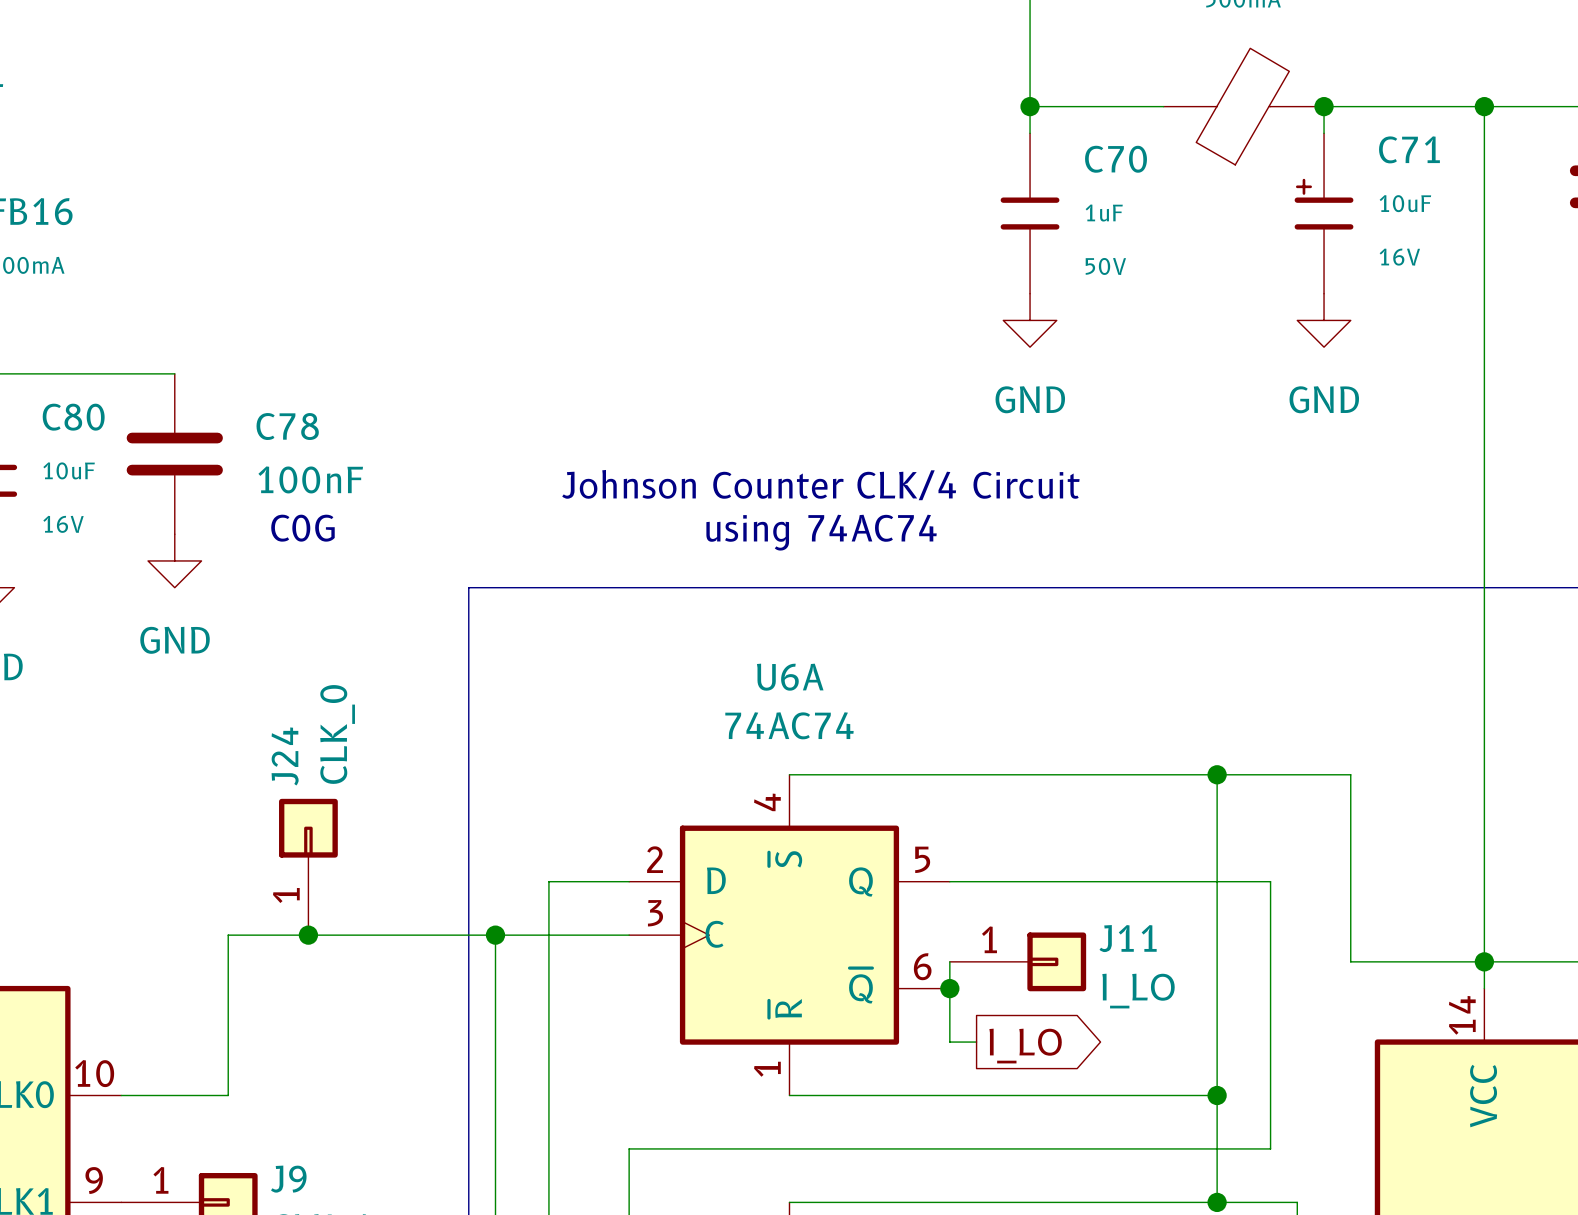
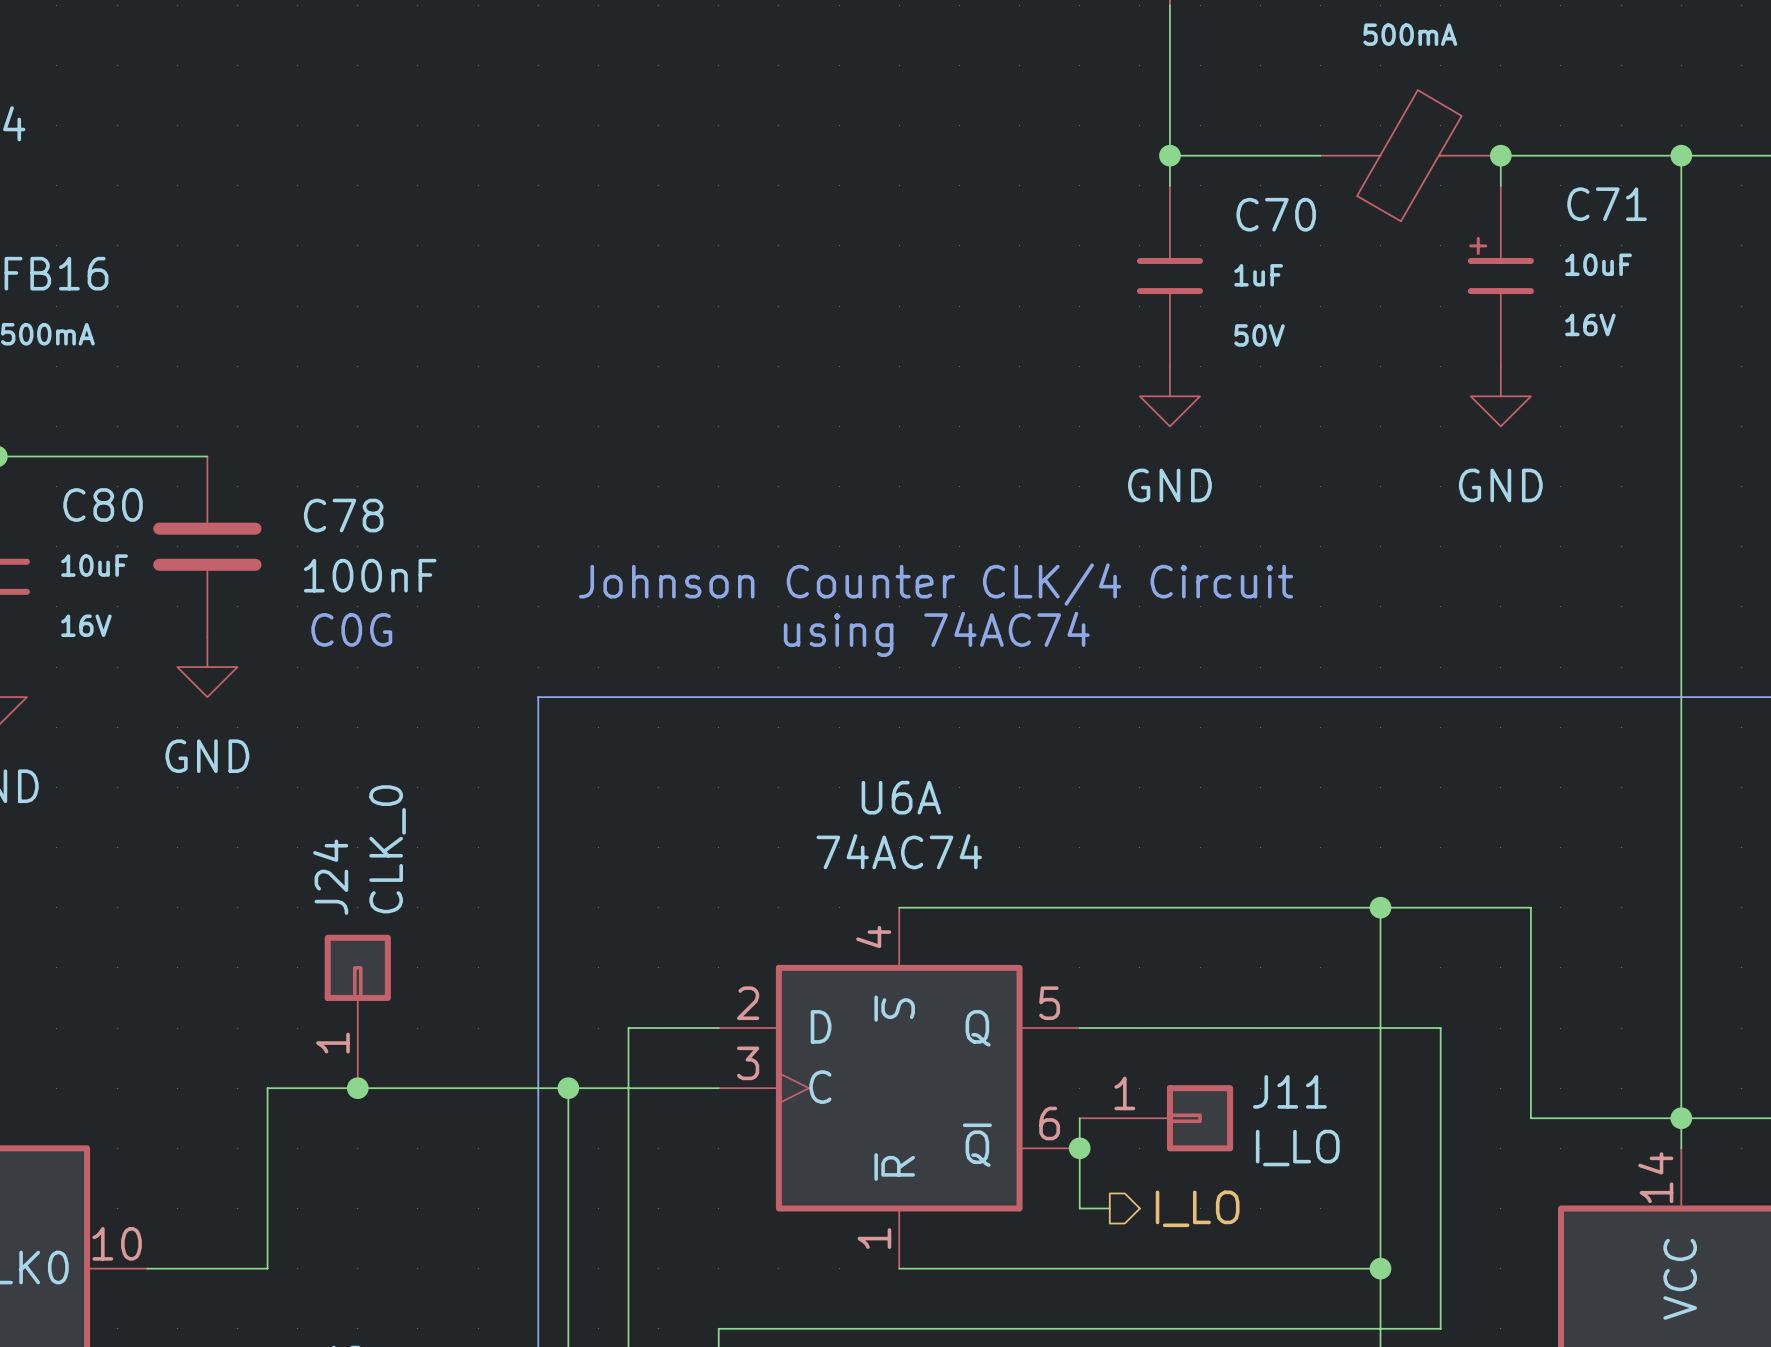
hierarchical label: none -> I_LO (1197, 1208)
global label: I_LO (1025, 1046) -> none

